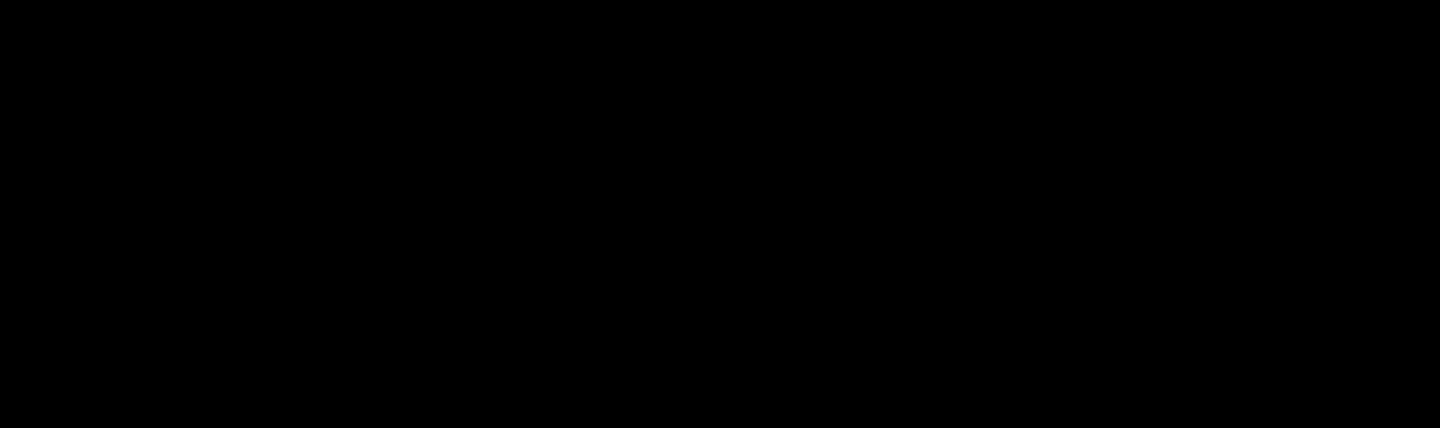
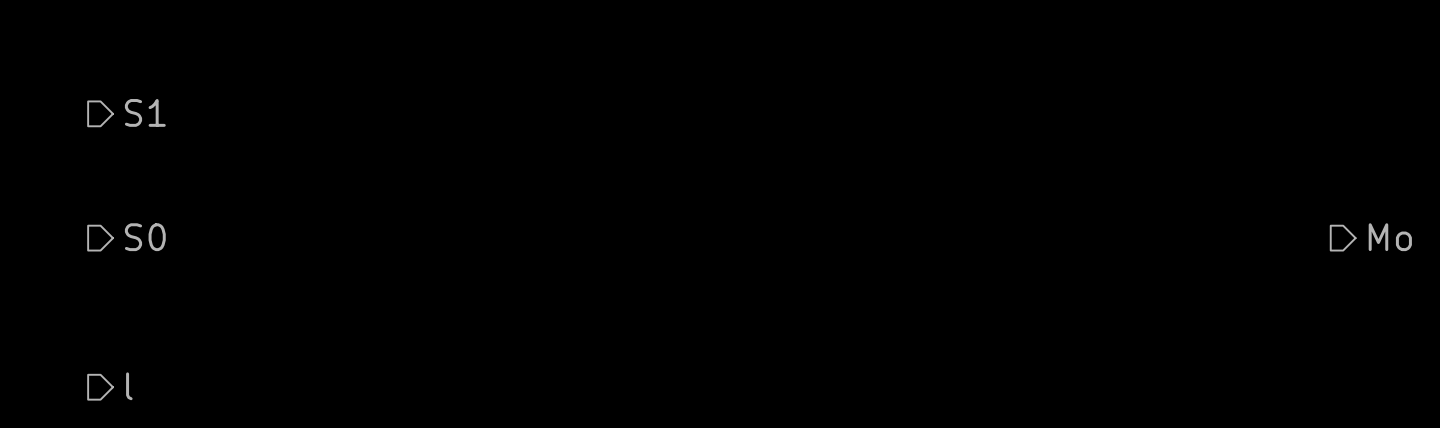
hierarchical label: none -> S1 (145, 112)
hierarchical label: none -> S0 (145, 237)
hierarchical label: none -> Mo (1390, 237)
hierarchical label: none -> l (129, 386)

